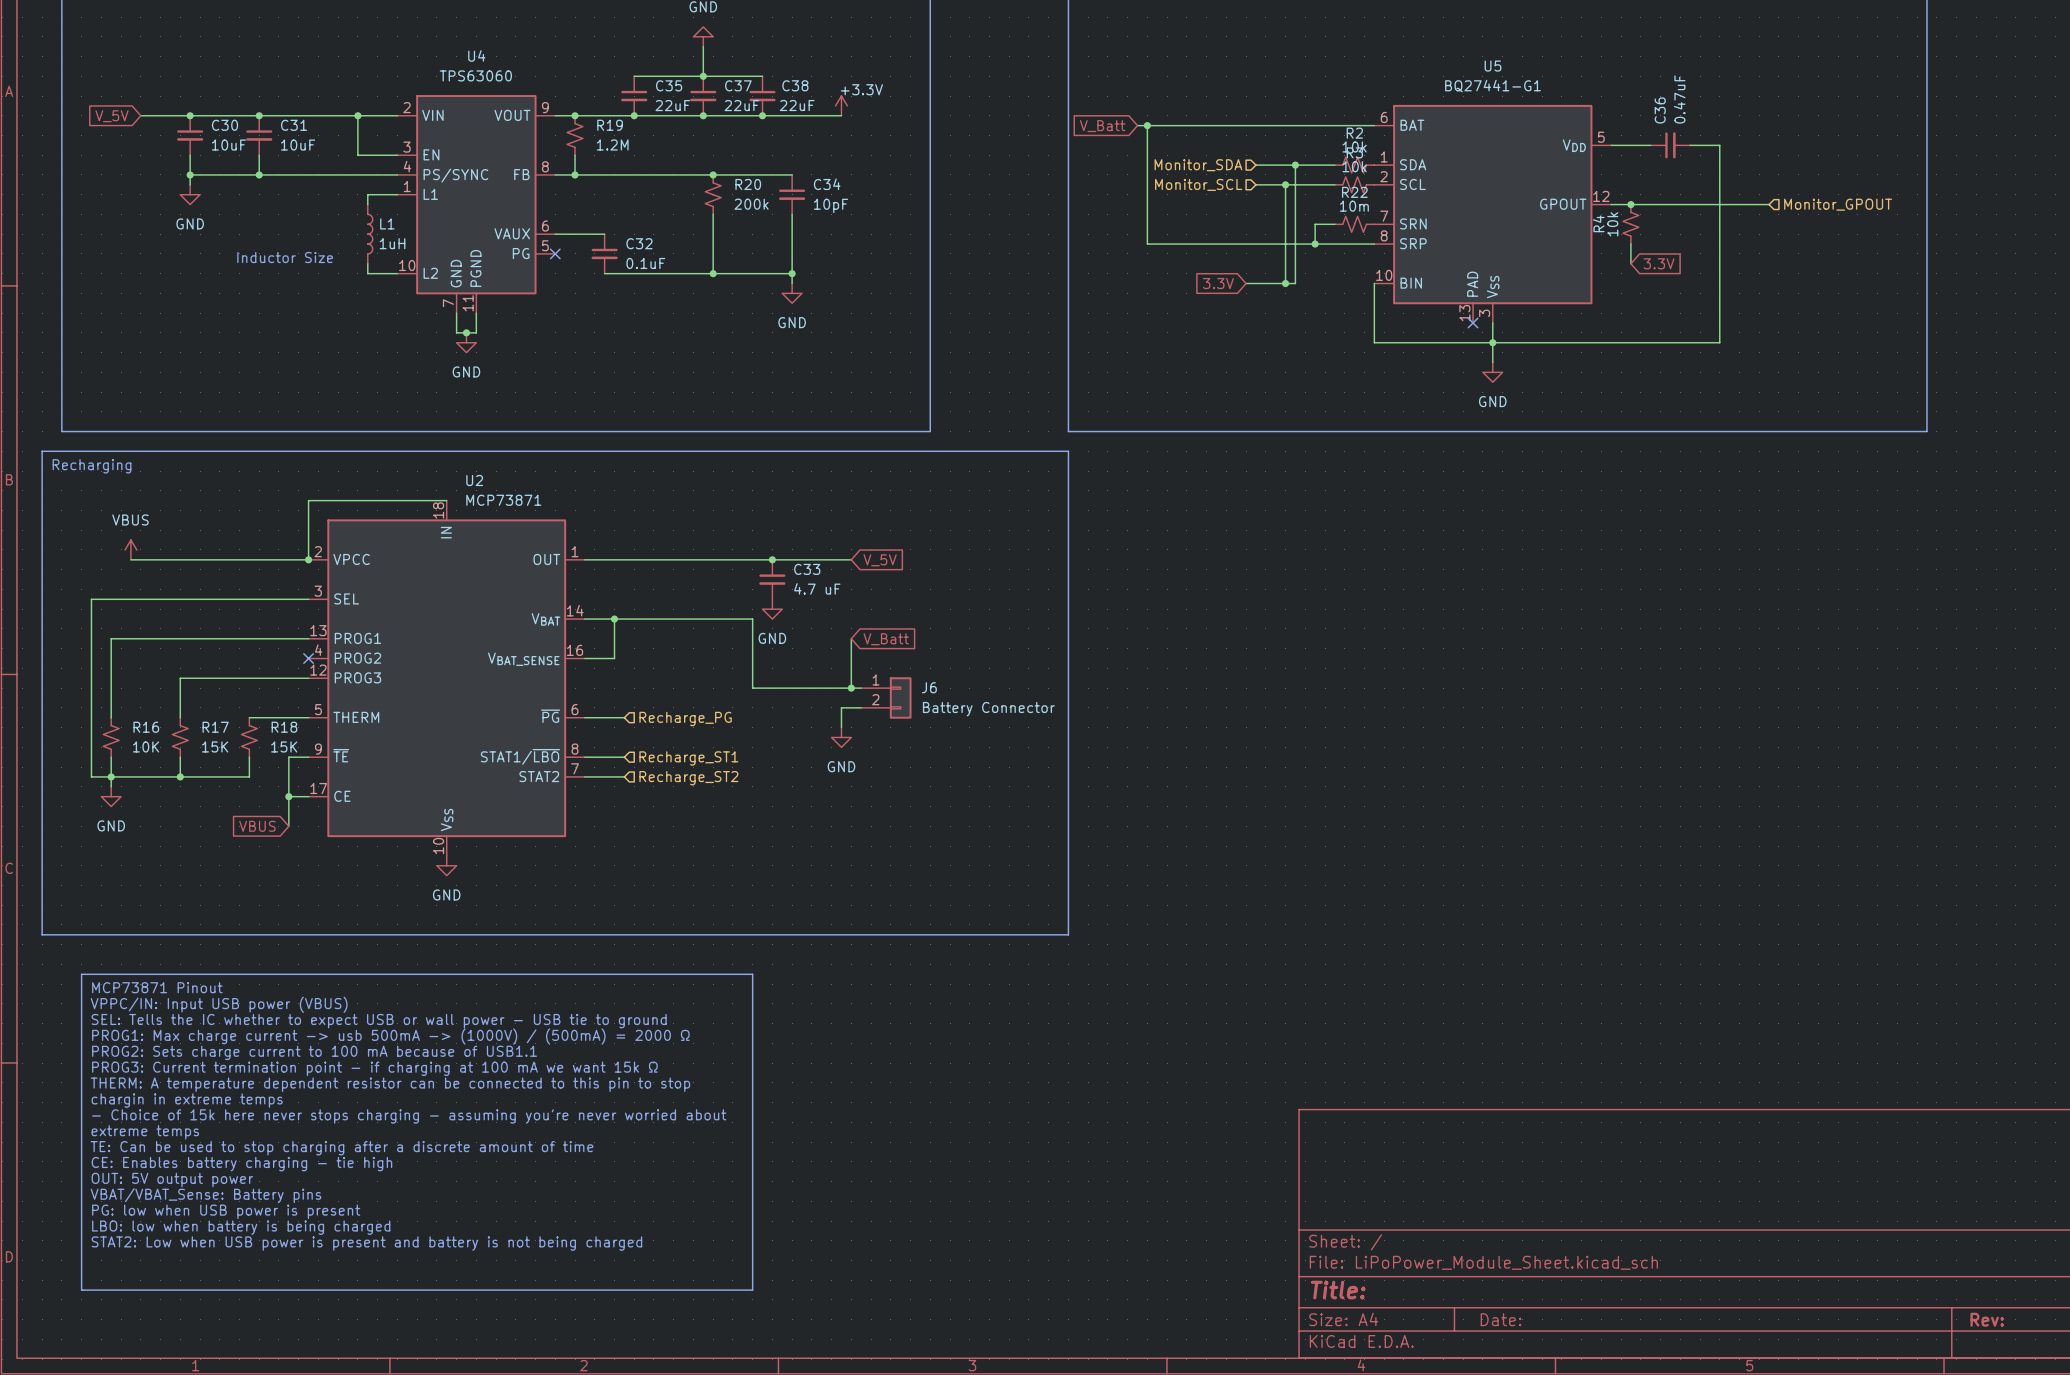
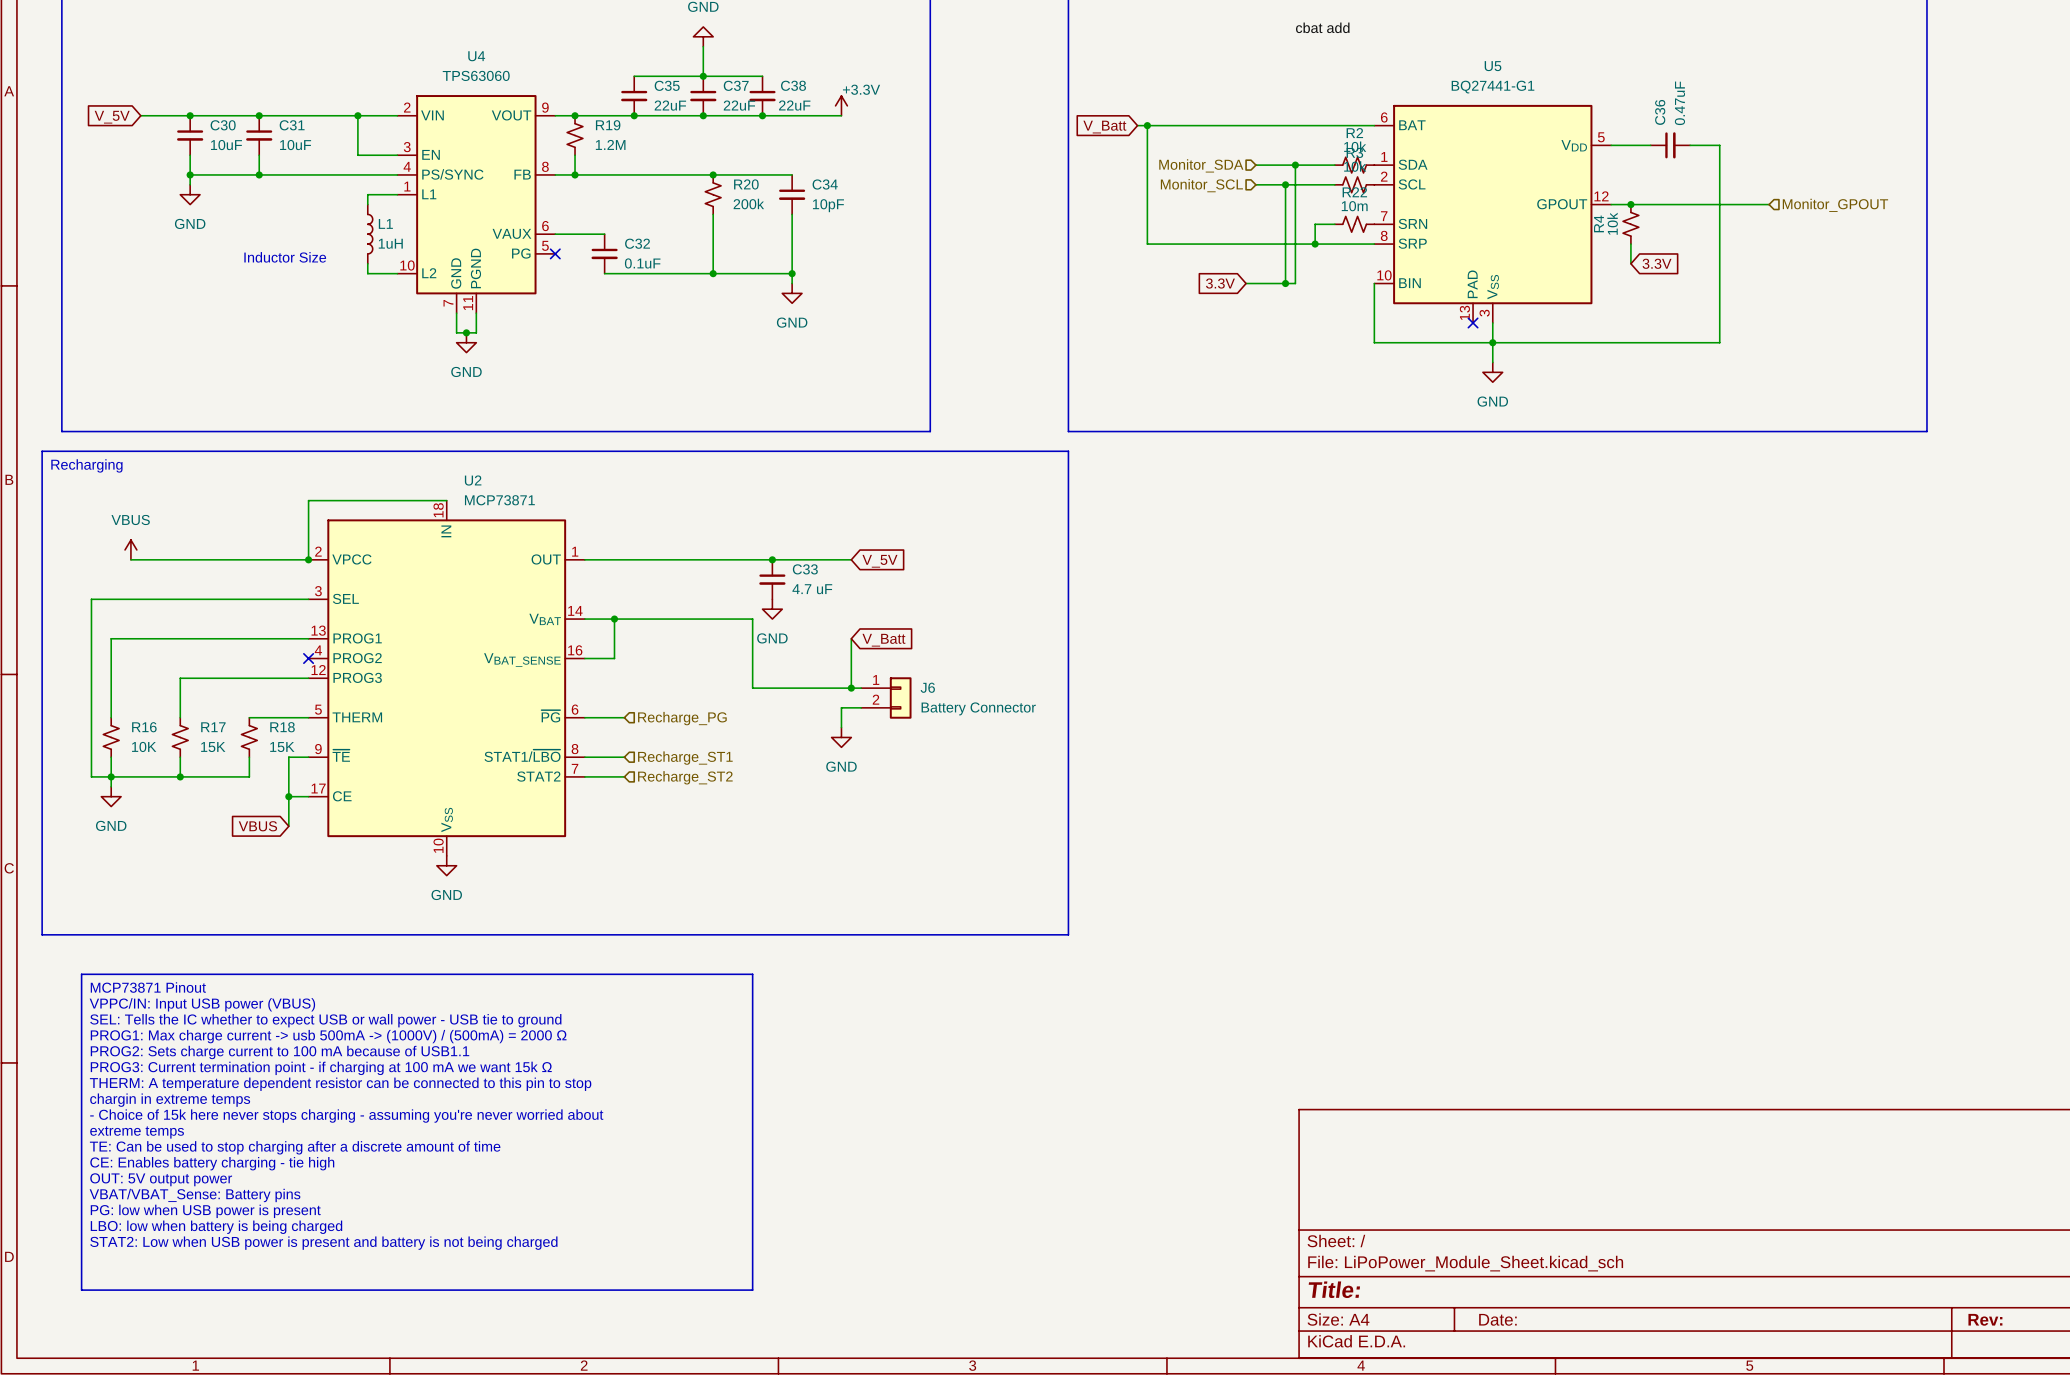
label: none -> cbat add (1322, 27)

